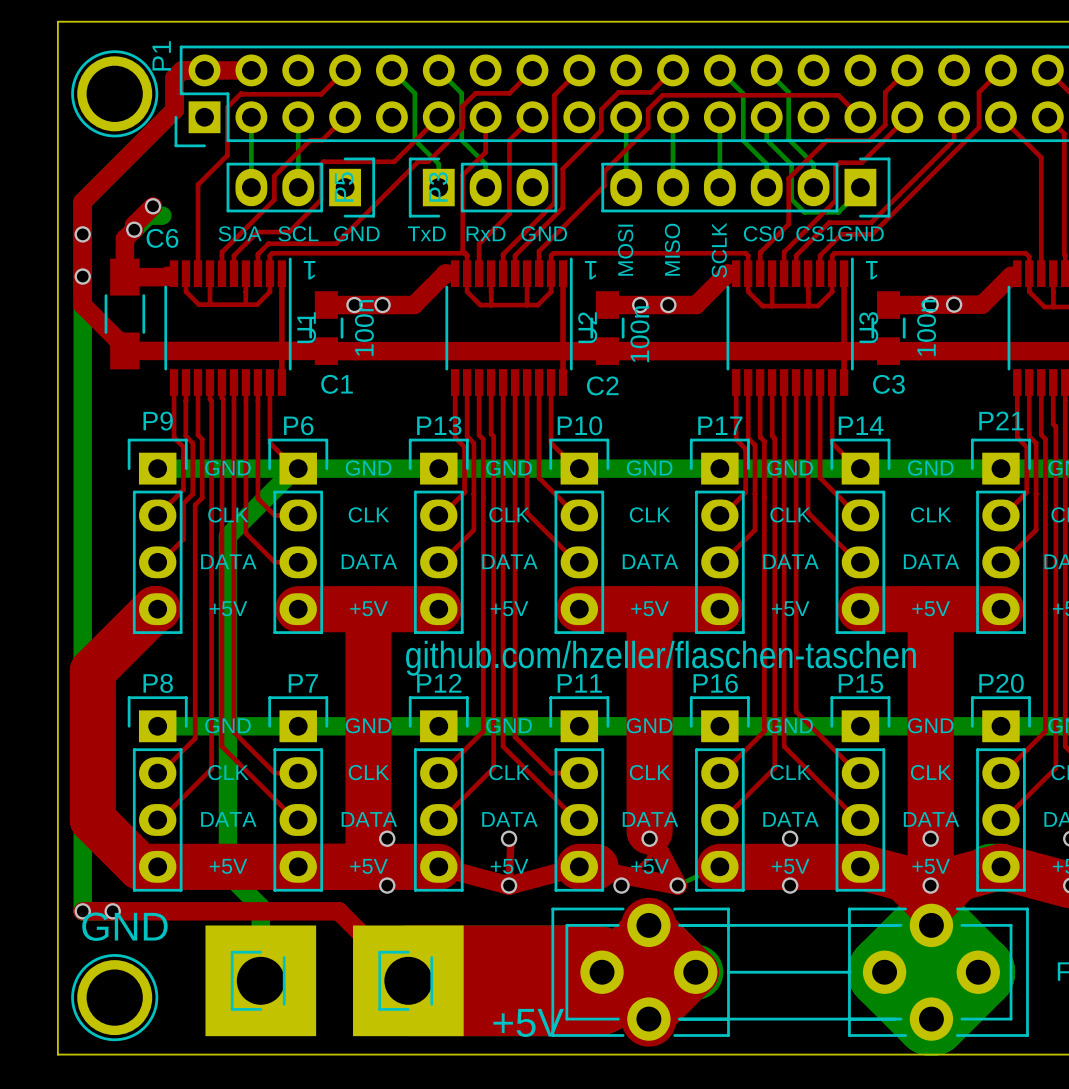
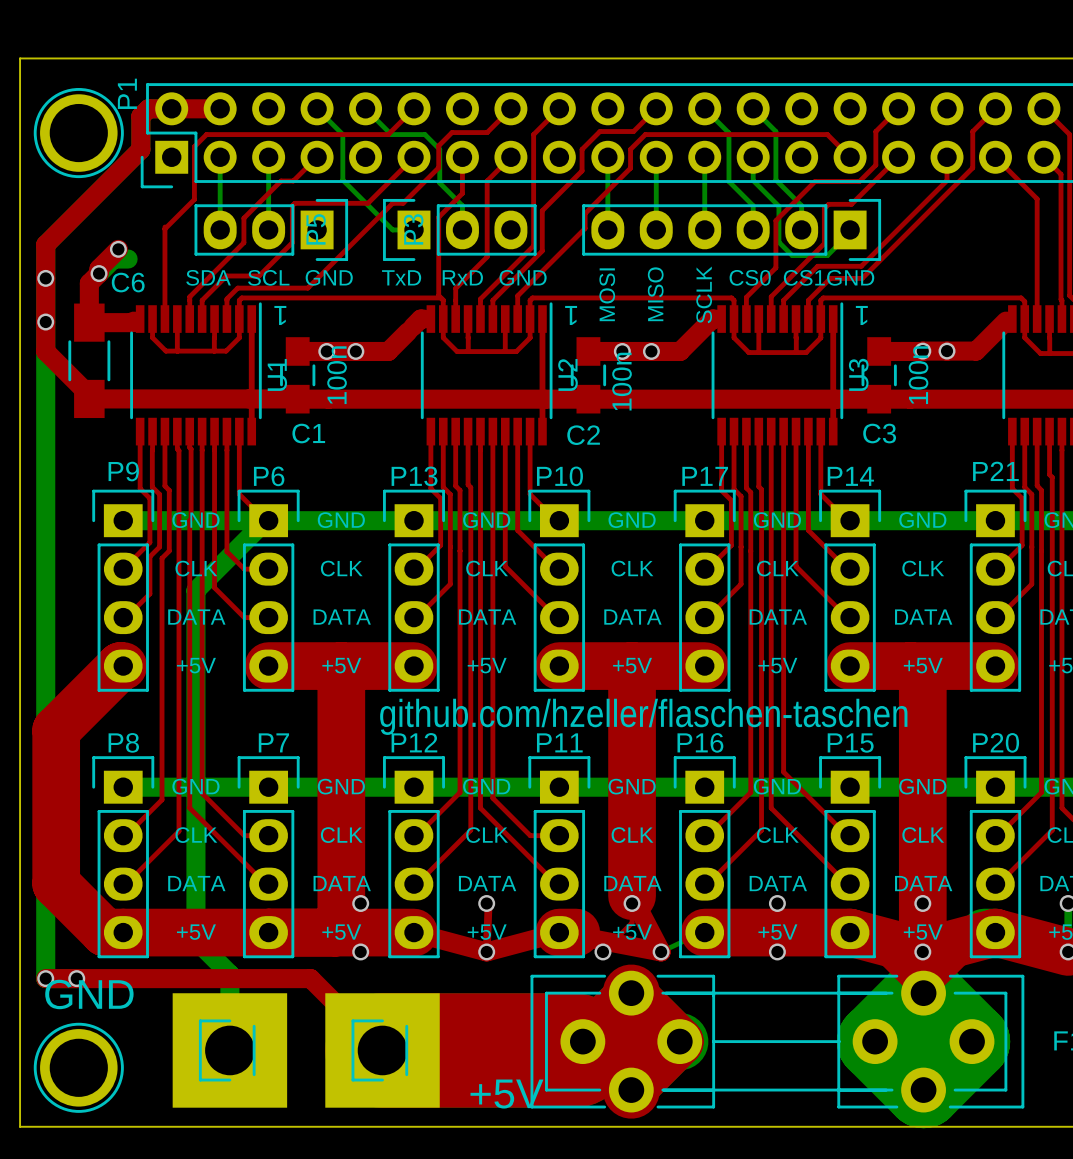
top track: (345, 70) (321, 94) (241, 93) (227, 107) (227, 155) (197, 184) -> none
bottom track: (438, 70) (461, 93) (461, 140) (463, 142) -> (389, 132) (391, 134) (424, 134) (439, 149) (439, 183)
top track: none -> (414, 108) (388, 134) (206, 134) (194, 146) (194, 199) (164, 228)
bottom track: (414, 93) (414, 140) (438, 164) (438, 187) -> (317, 108) (342, 134) (342, 180) (392, 229) (414, 229)

